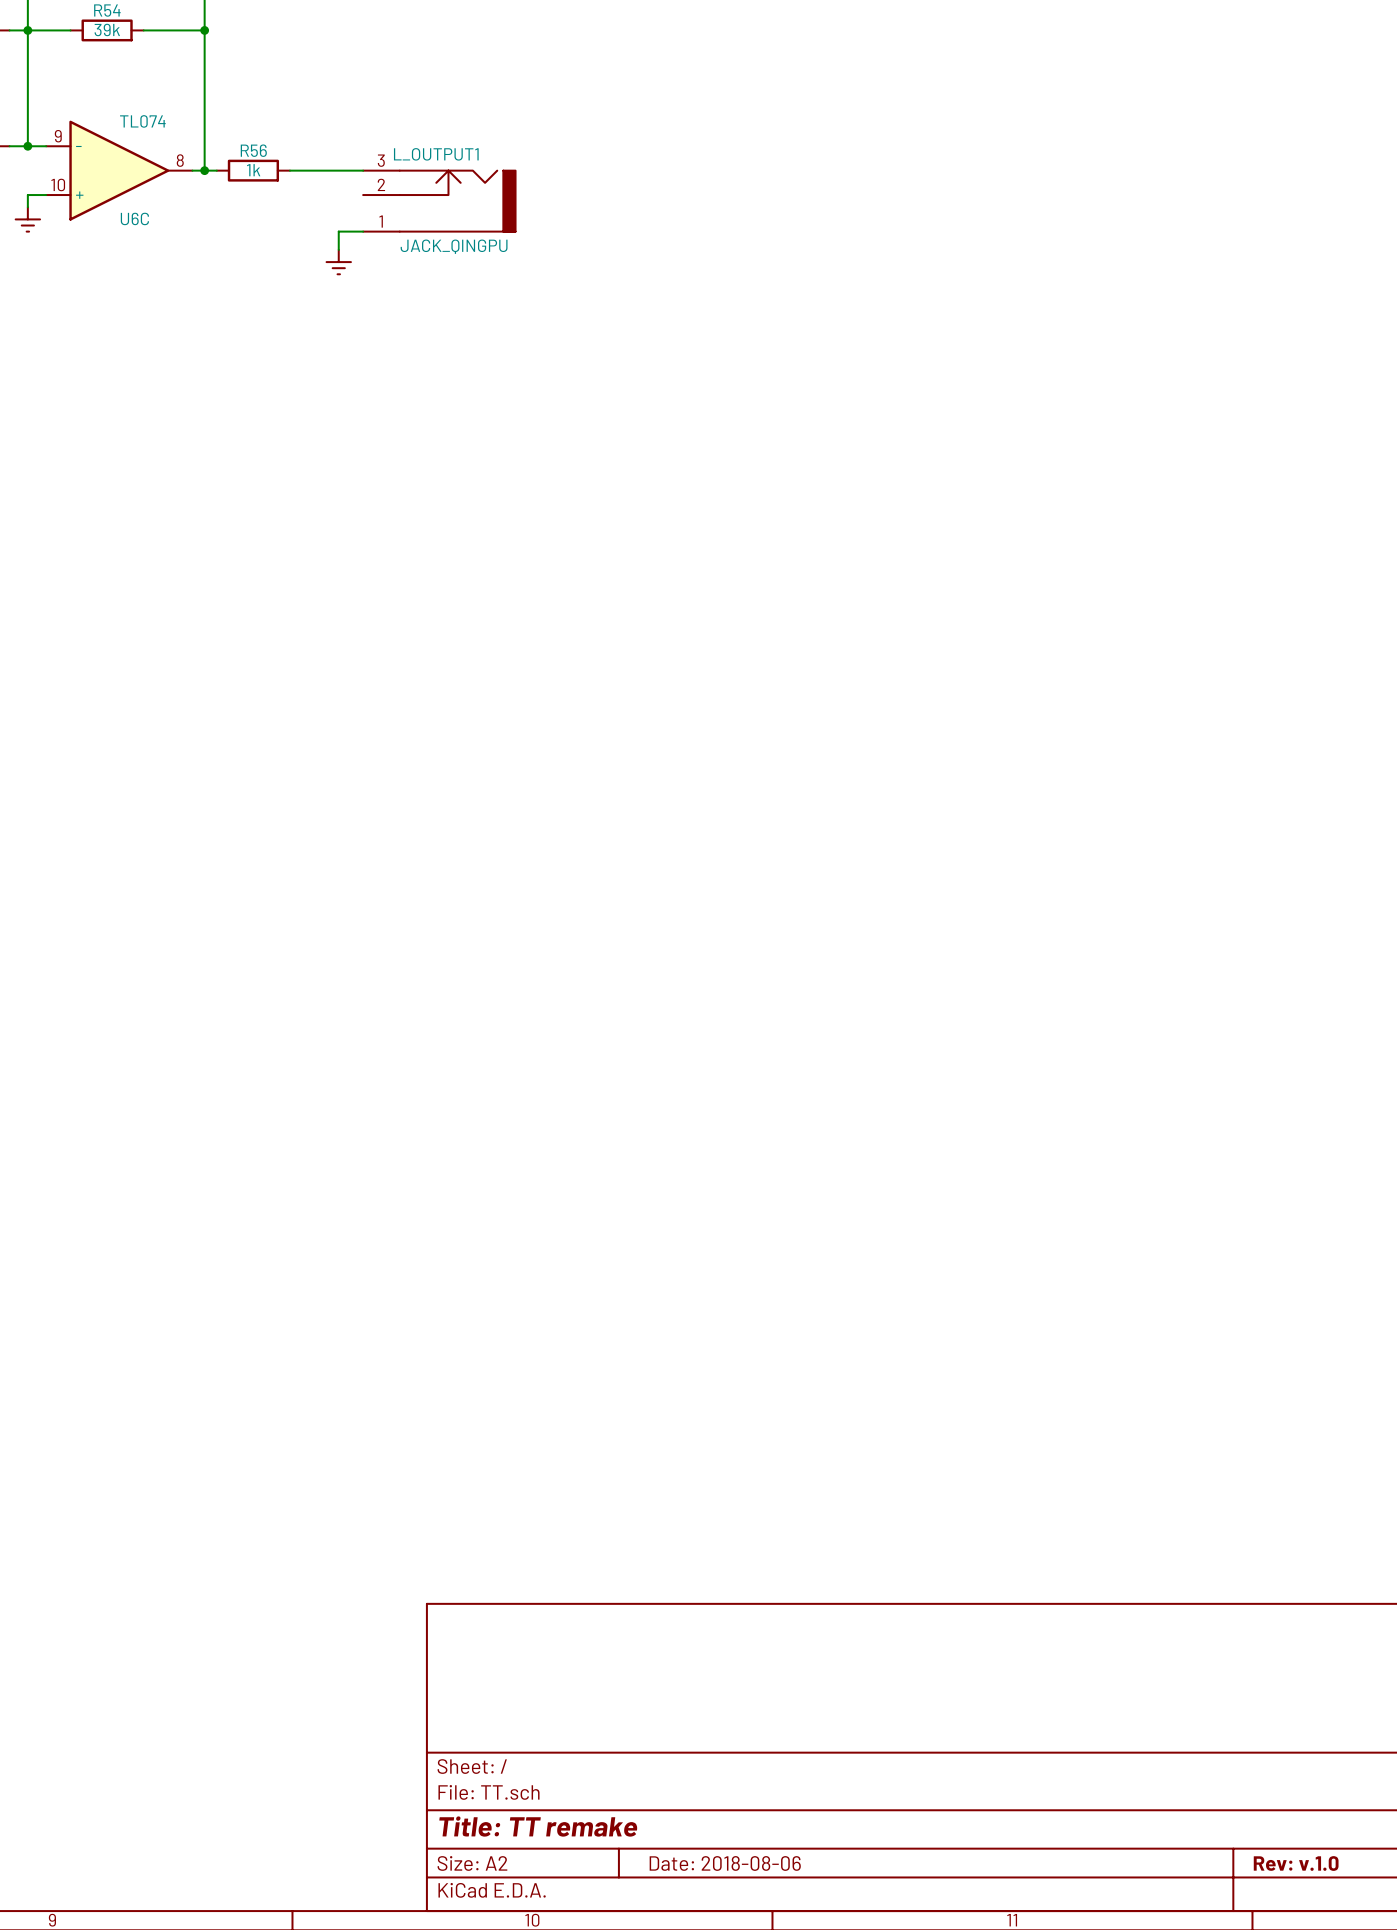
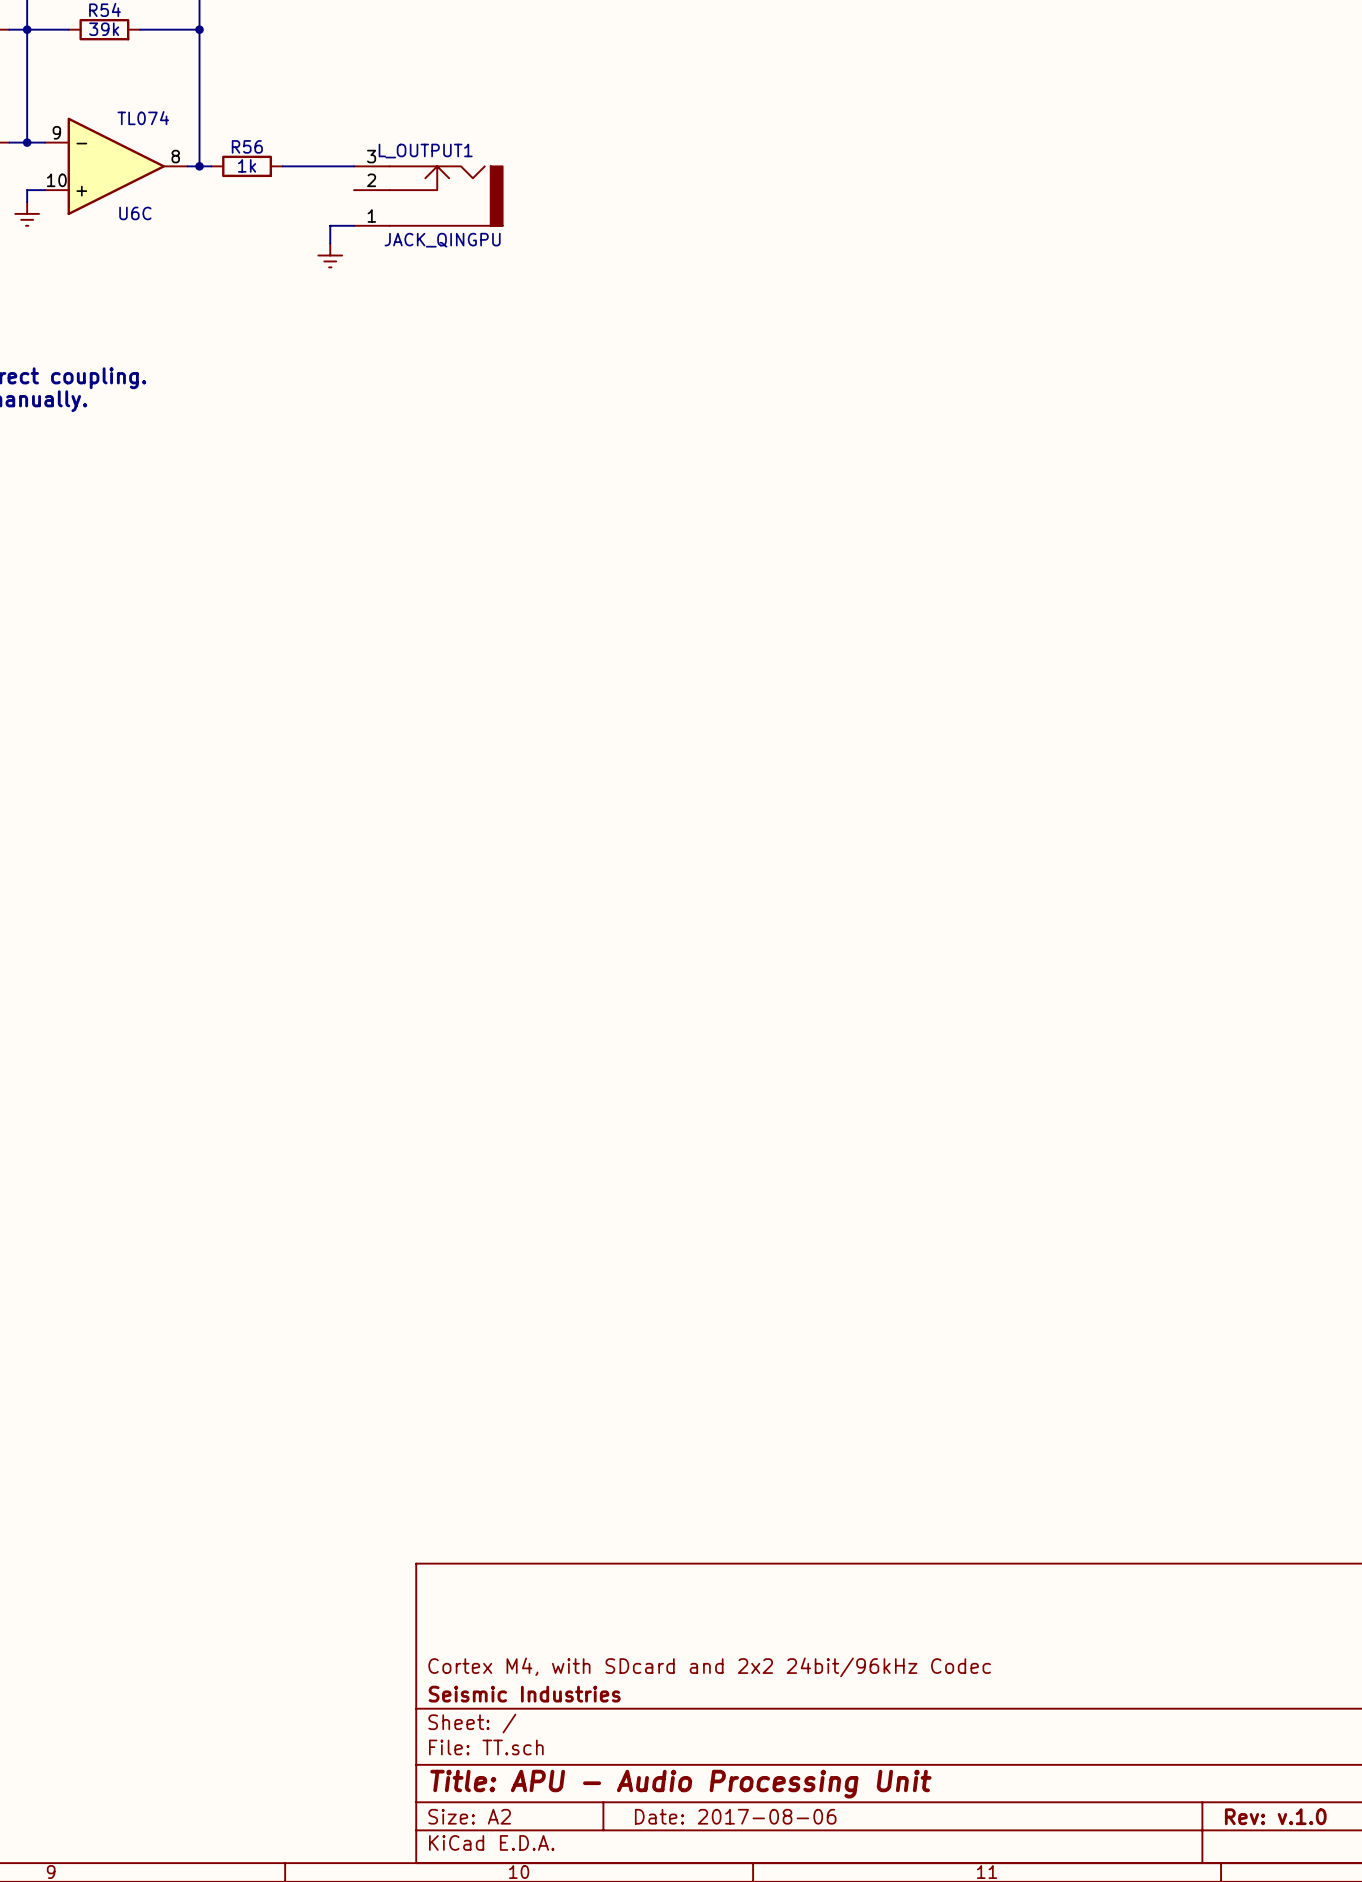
title block: none -> Cortex M4, with SDcard and 2x2 24bit/96kHz Codec (709, 1667)
title block: none -> Seismic Industries (524, 1694)
title block: Title: TT remake (538, 1826) -> Title: APU - Audio Processing Unit (680, 1784)
title block: Date: 2018-08-06 (725, 1863) -> Date: 2017-08-06 (735, 1816)

